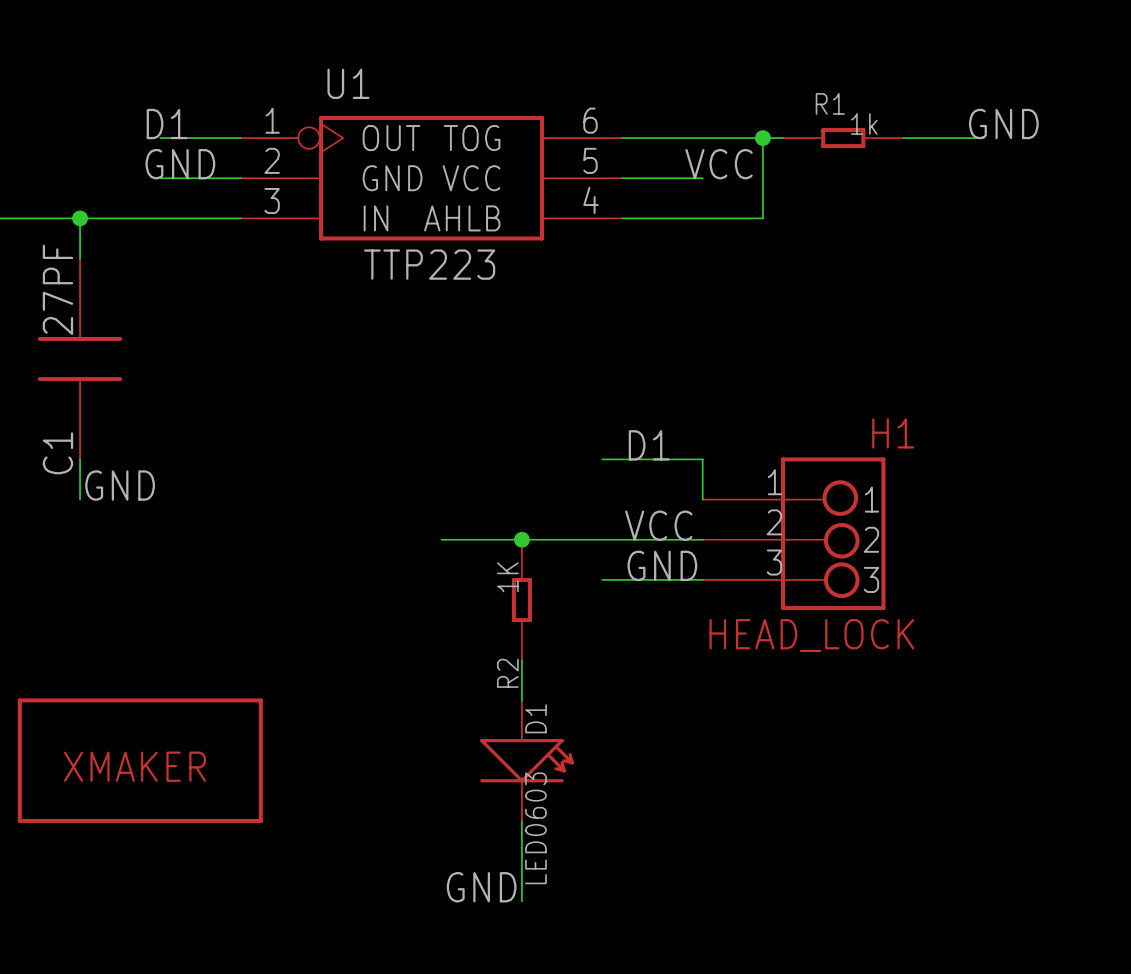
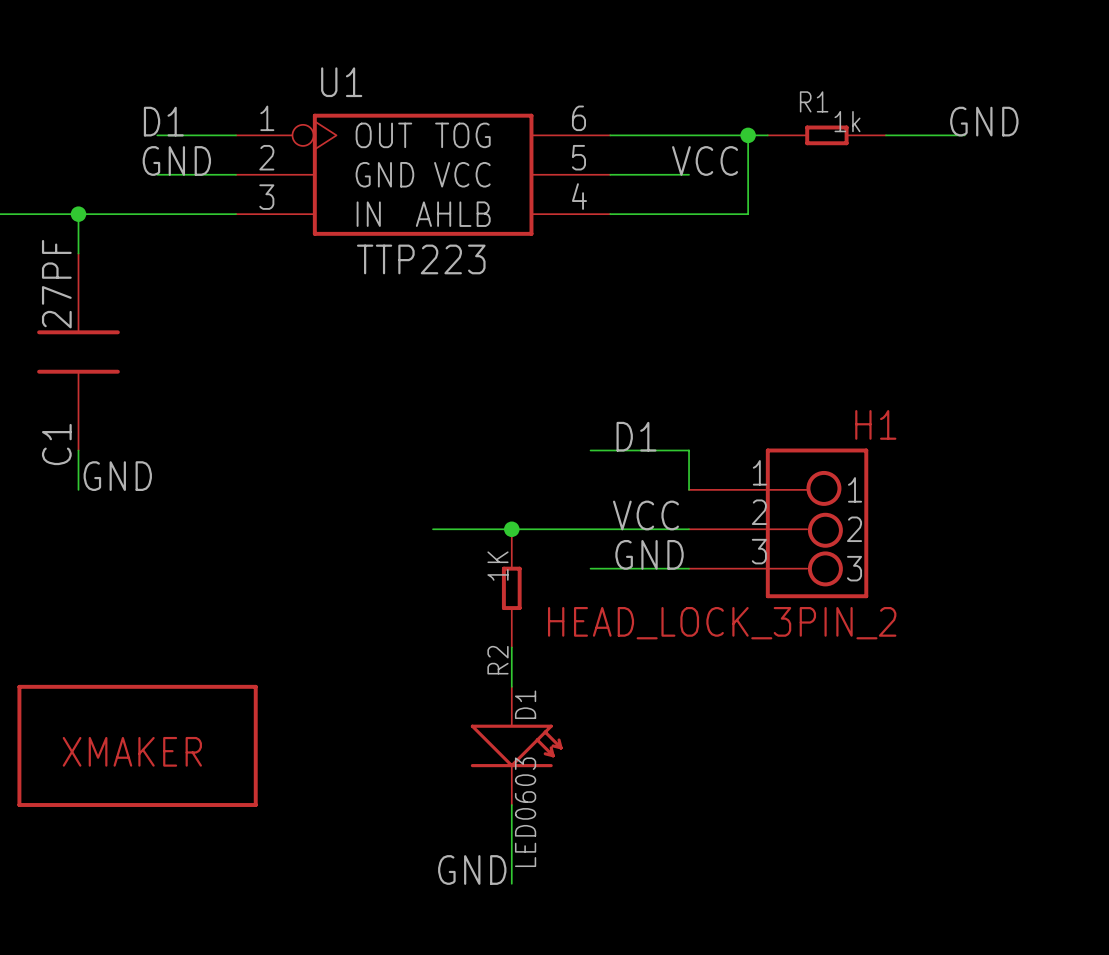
H1 value: HEAD_LOCK (811, 635) -> HEAD_LOCK_3PIN_2 (722, 623)

